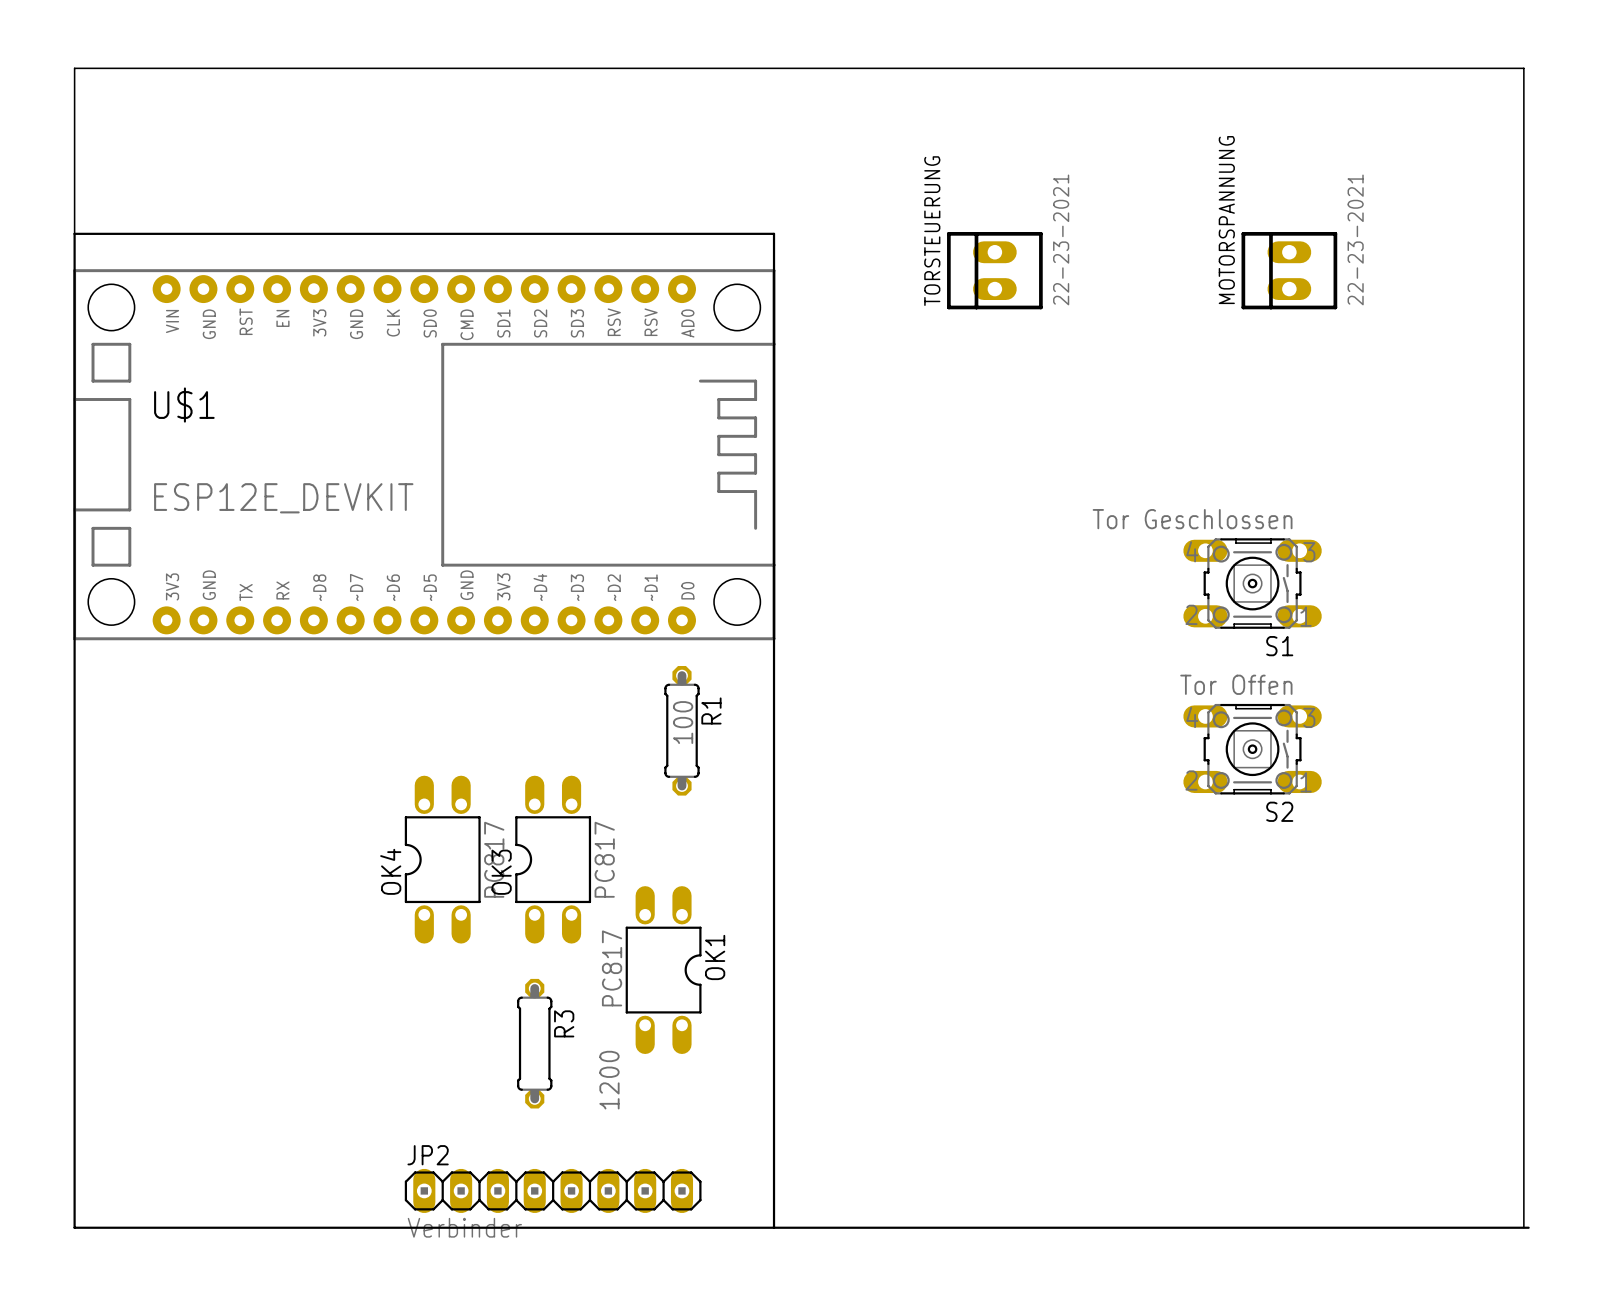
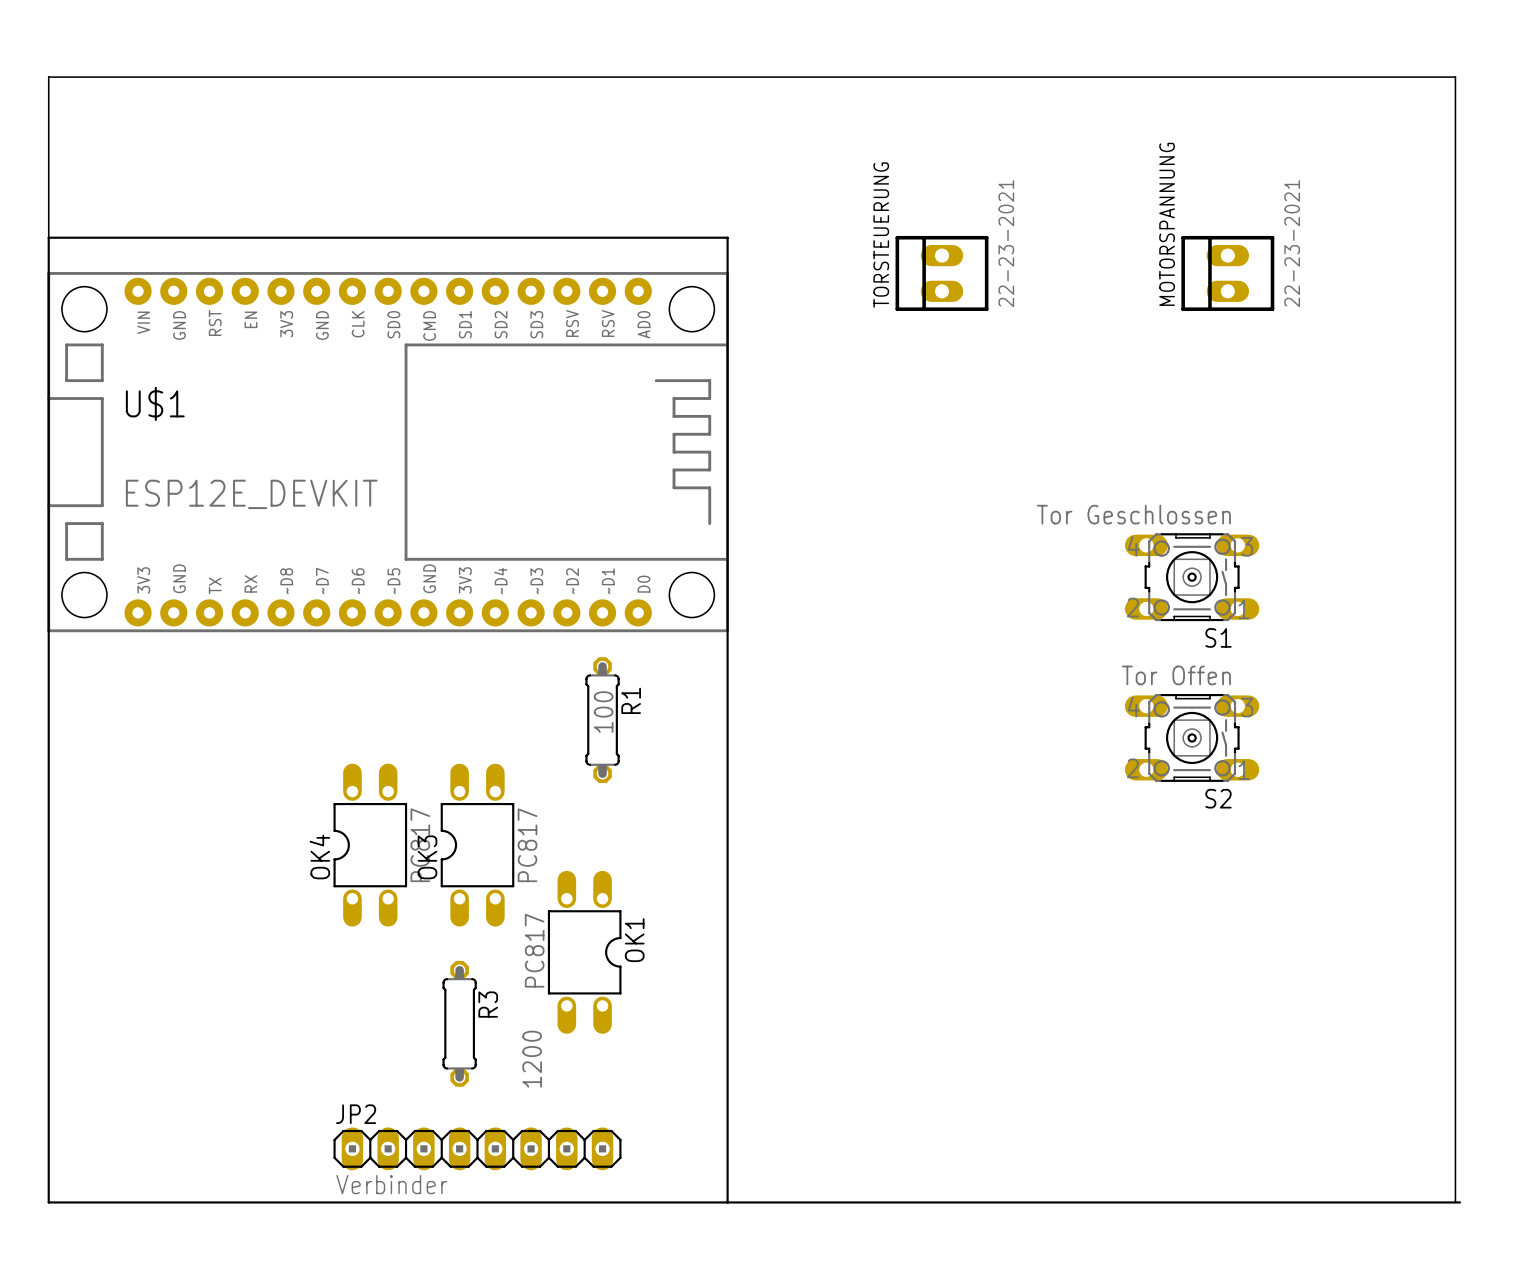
R1 position: (681, 730) -> (602, 720)
OK4 position: (442, 859) -> (370, 845)
OK3 position: (553, 859) -> (477, 845)
OK1 position: (663, 970) -> (584, 952)
R3 position: (534, 1043) -> (459, 1023)
JP2 position: (553, 1190) -> (477, 1148)

